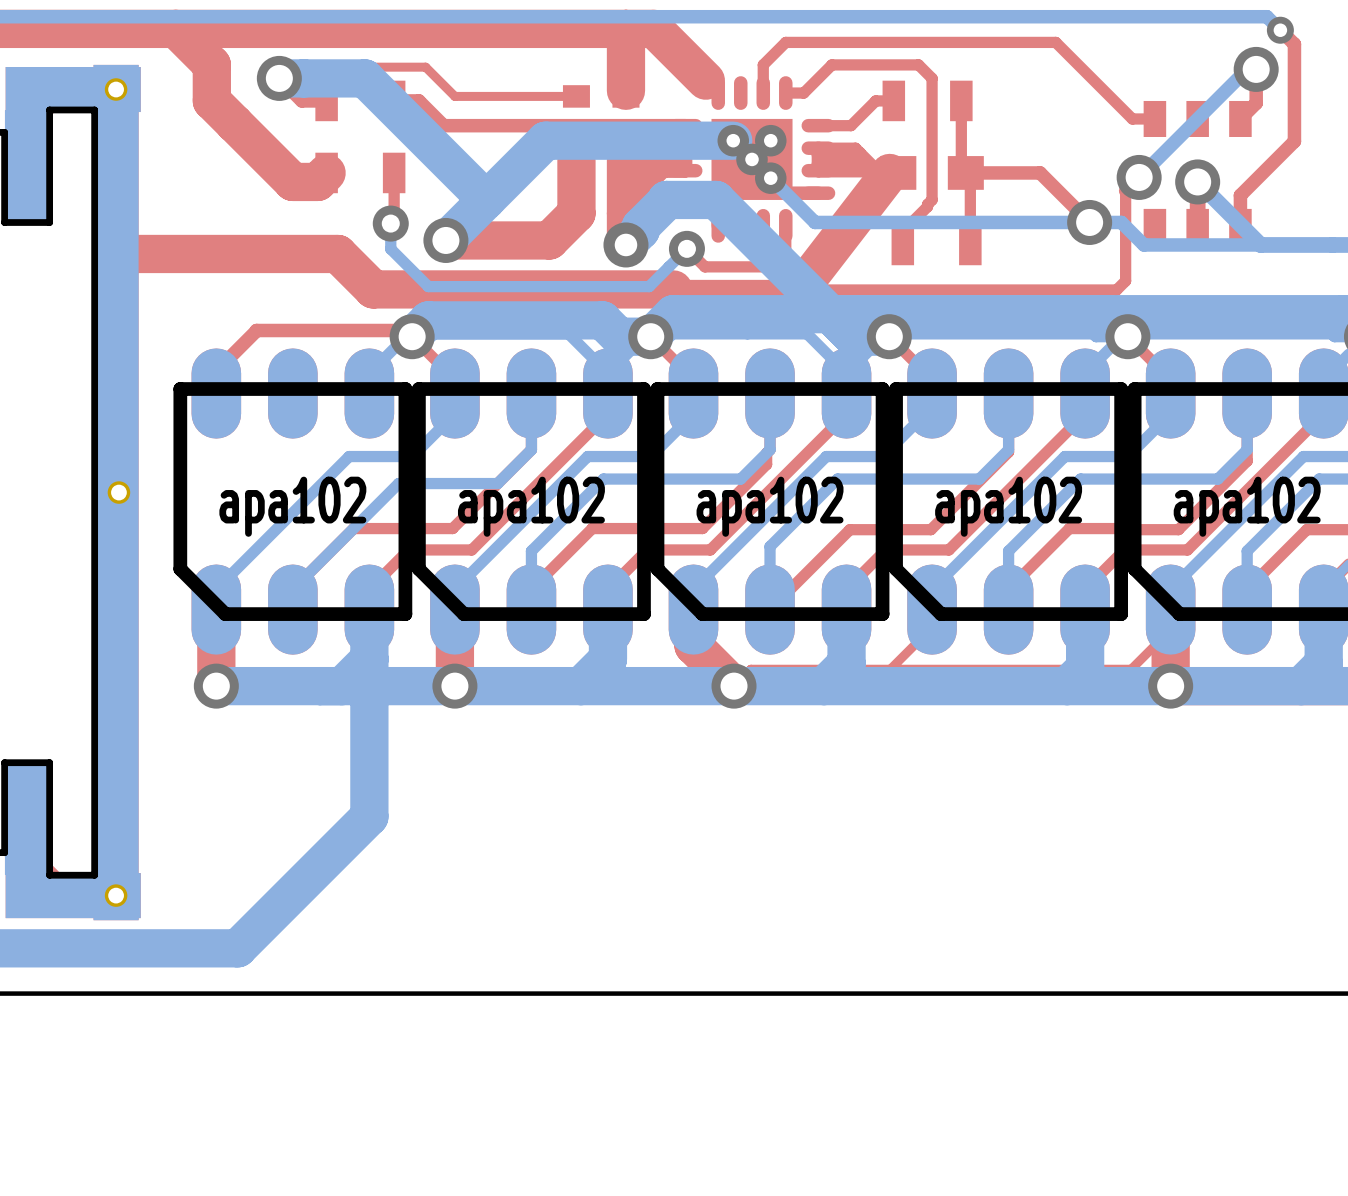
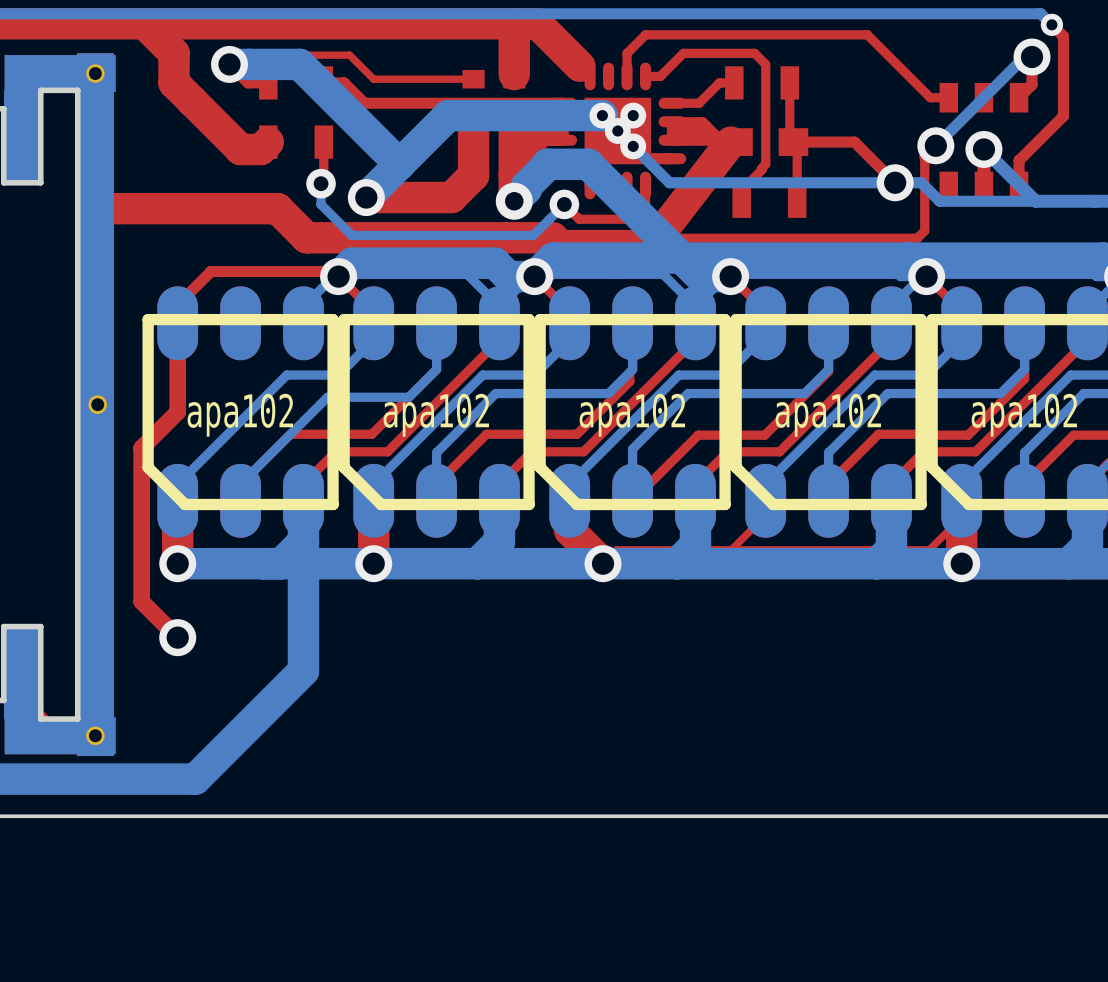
top track: none -> (177, 323) (177, 412) (141, 448) (141, 601) (177, 637)
via: none -> (177, 637)

